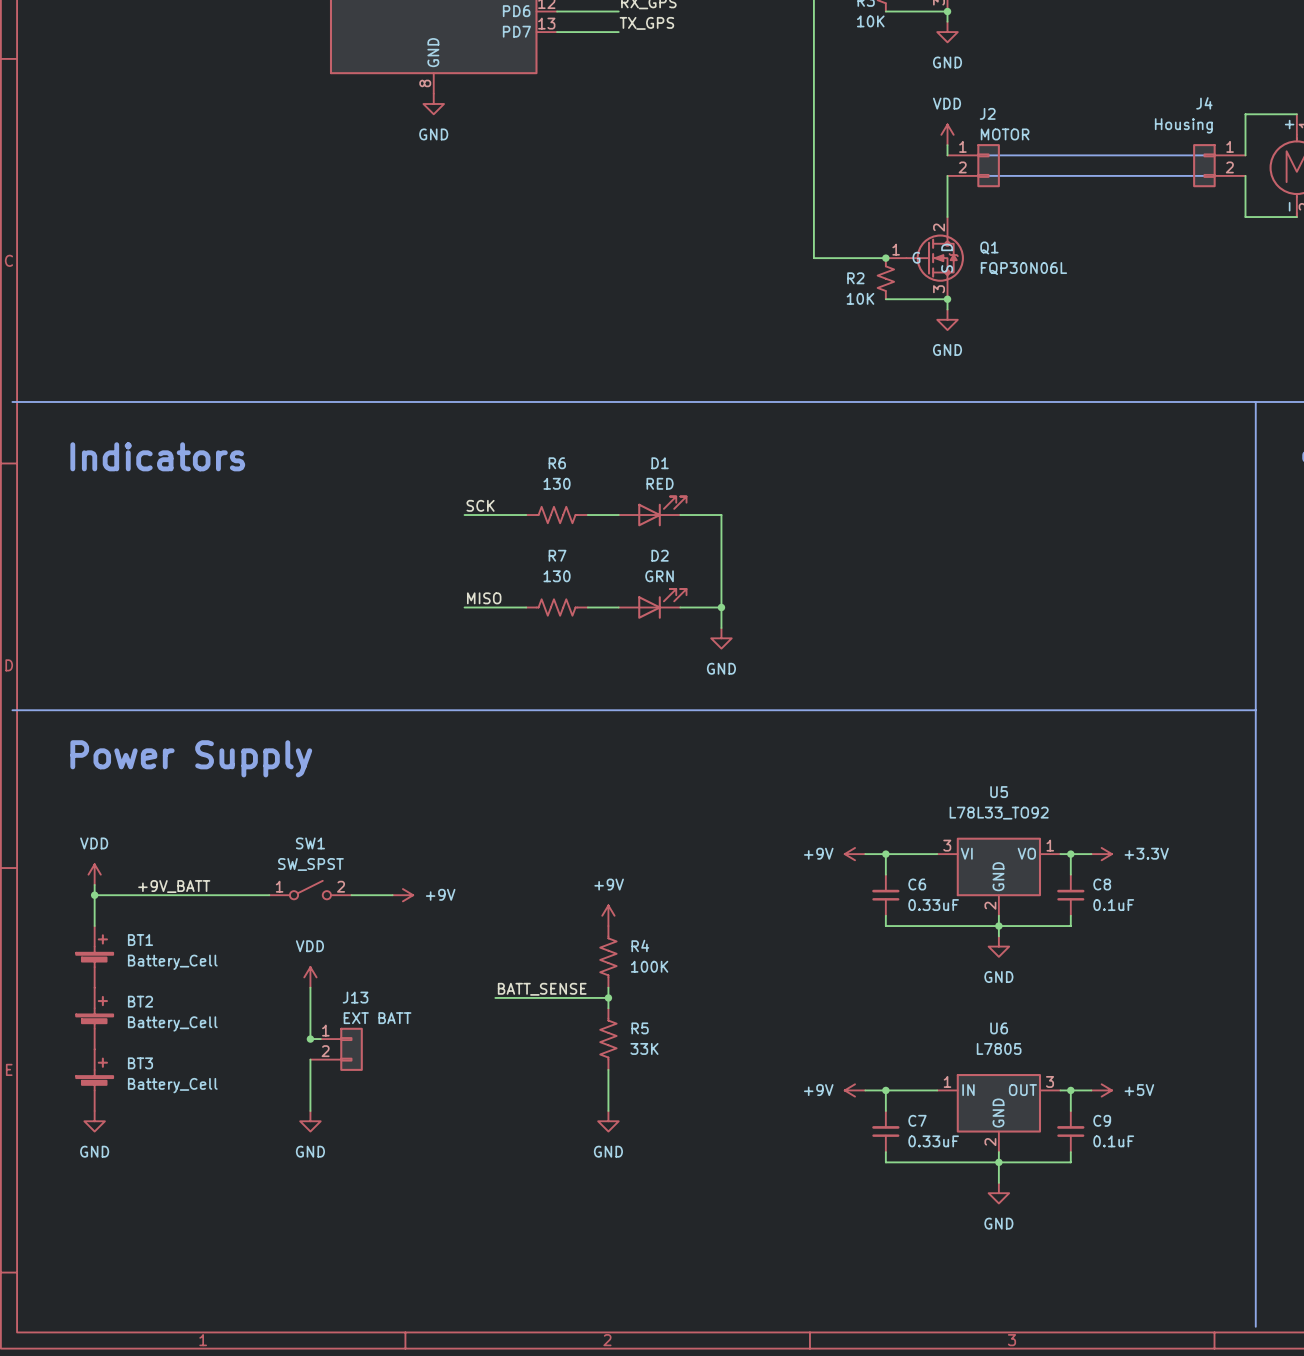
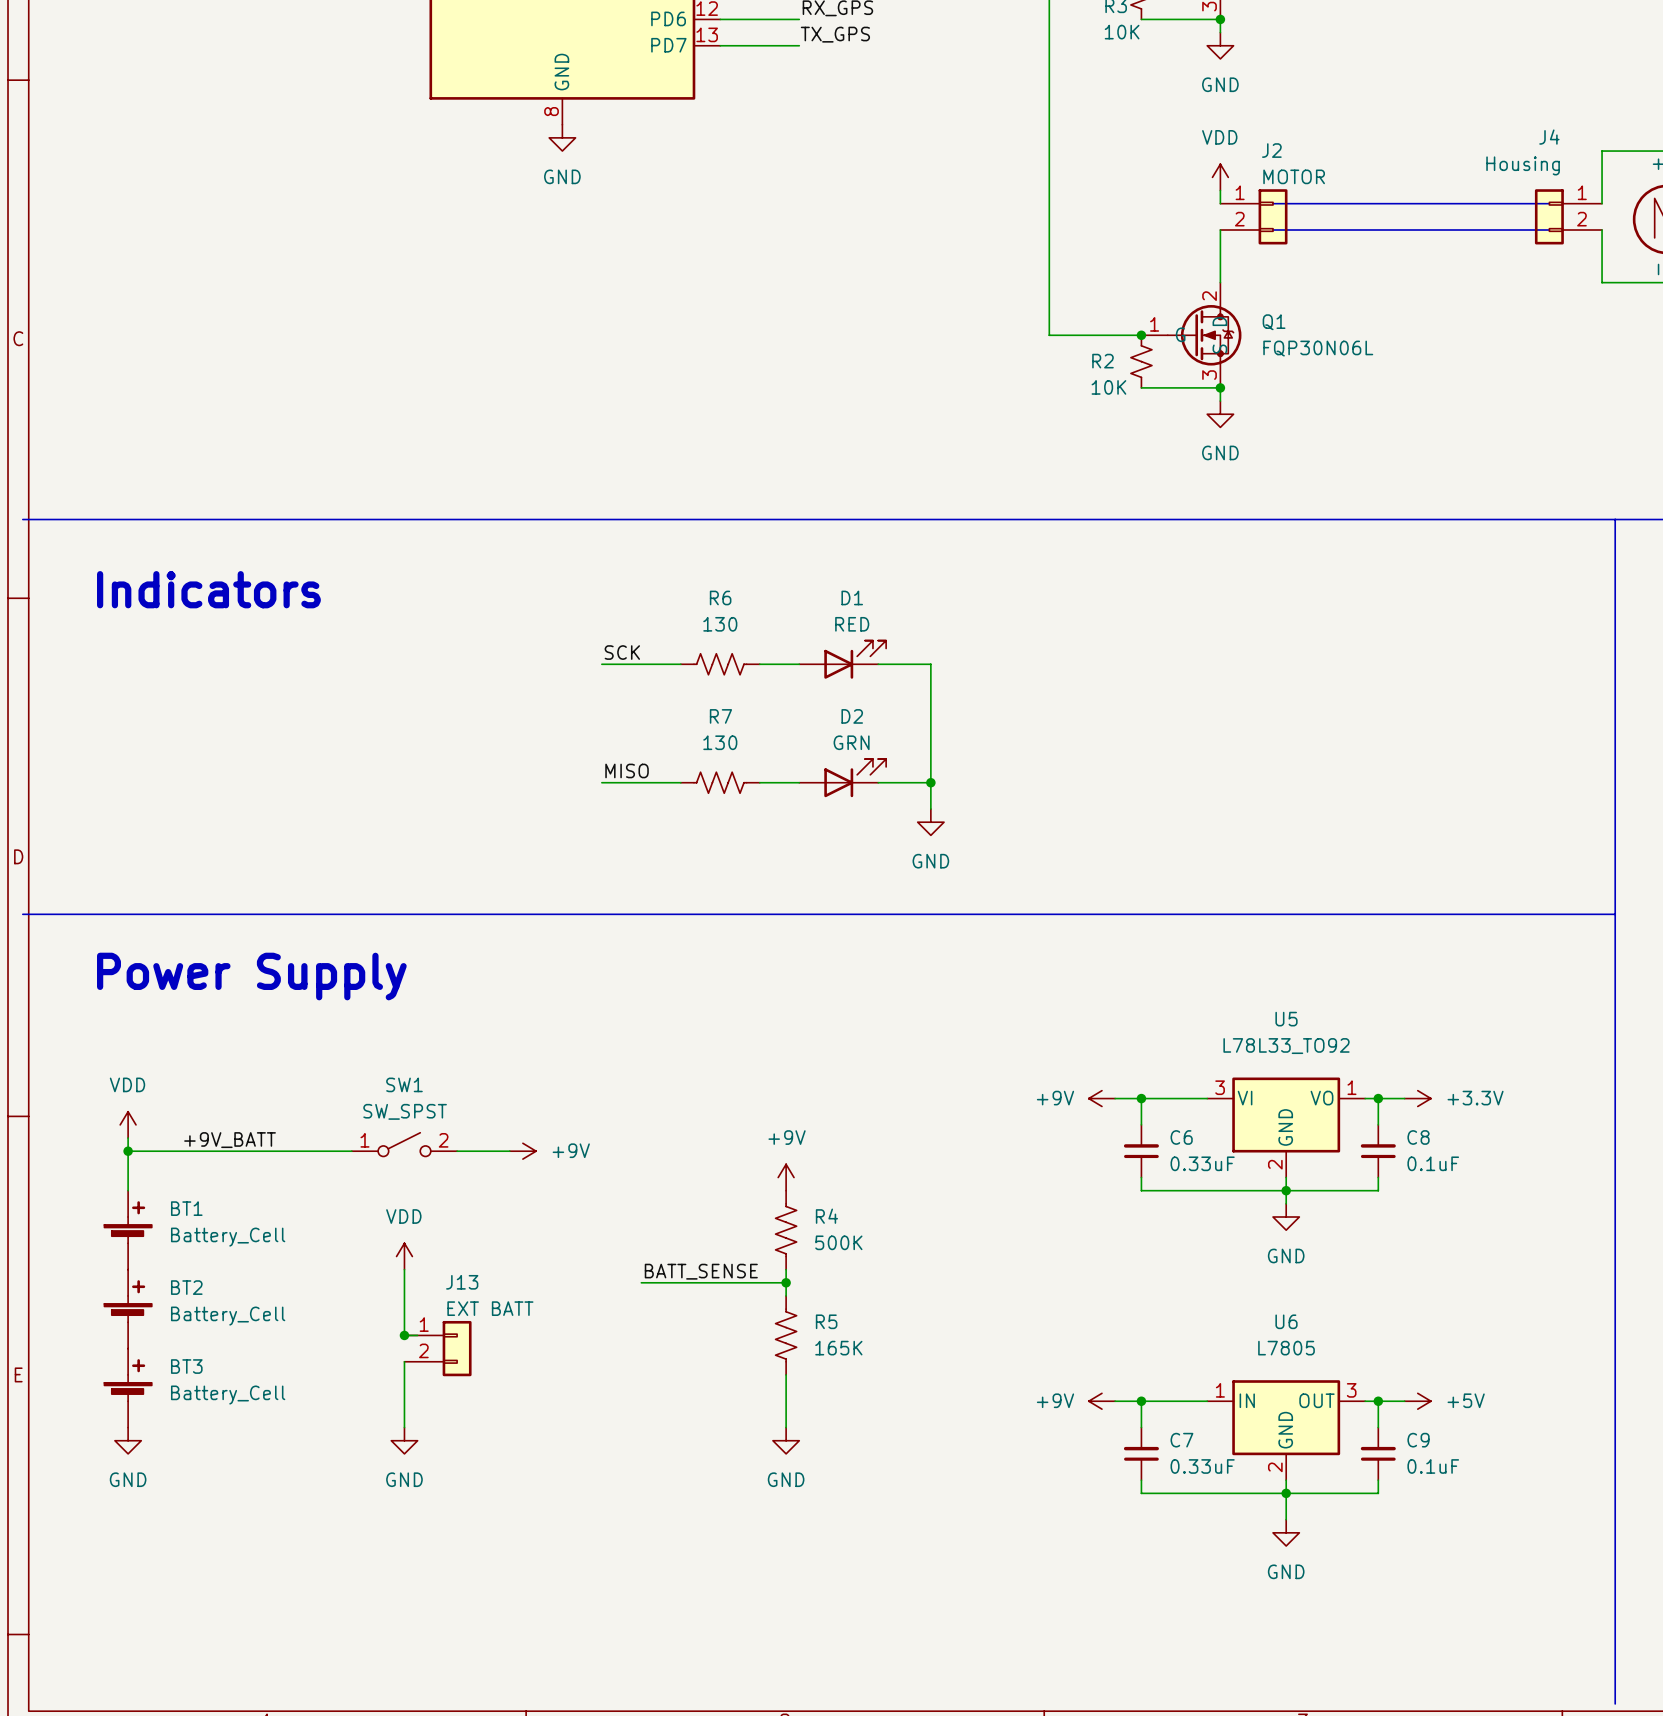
R4 value: 100K (649, 966) -> 500K (838, 1242)
R5 value: 33K (644, 1048) -> 165K (838, 1348)

